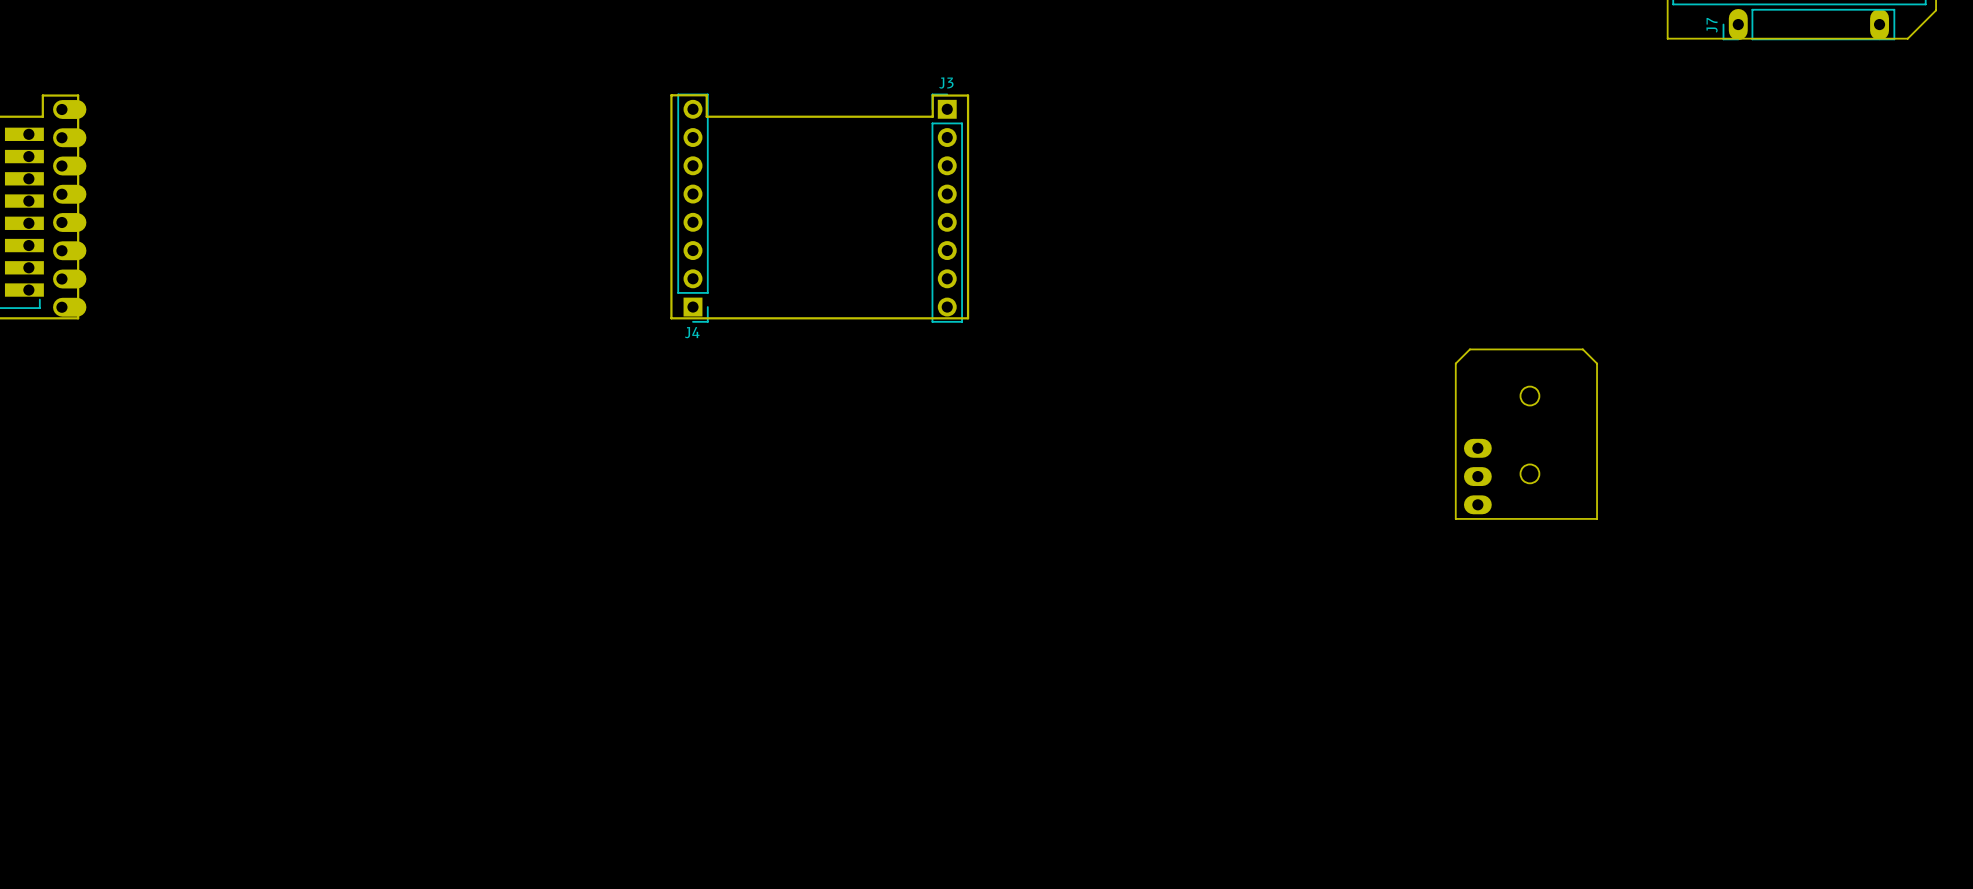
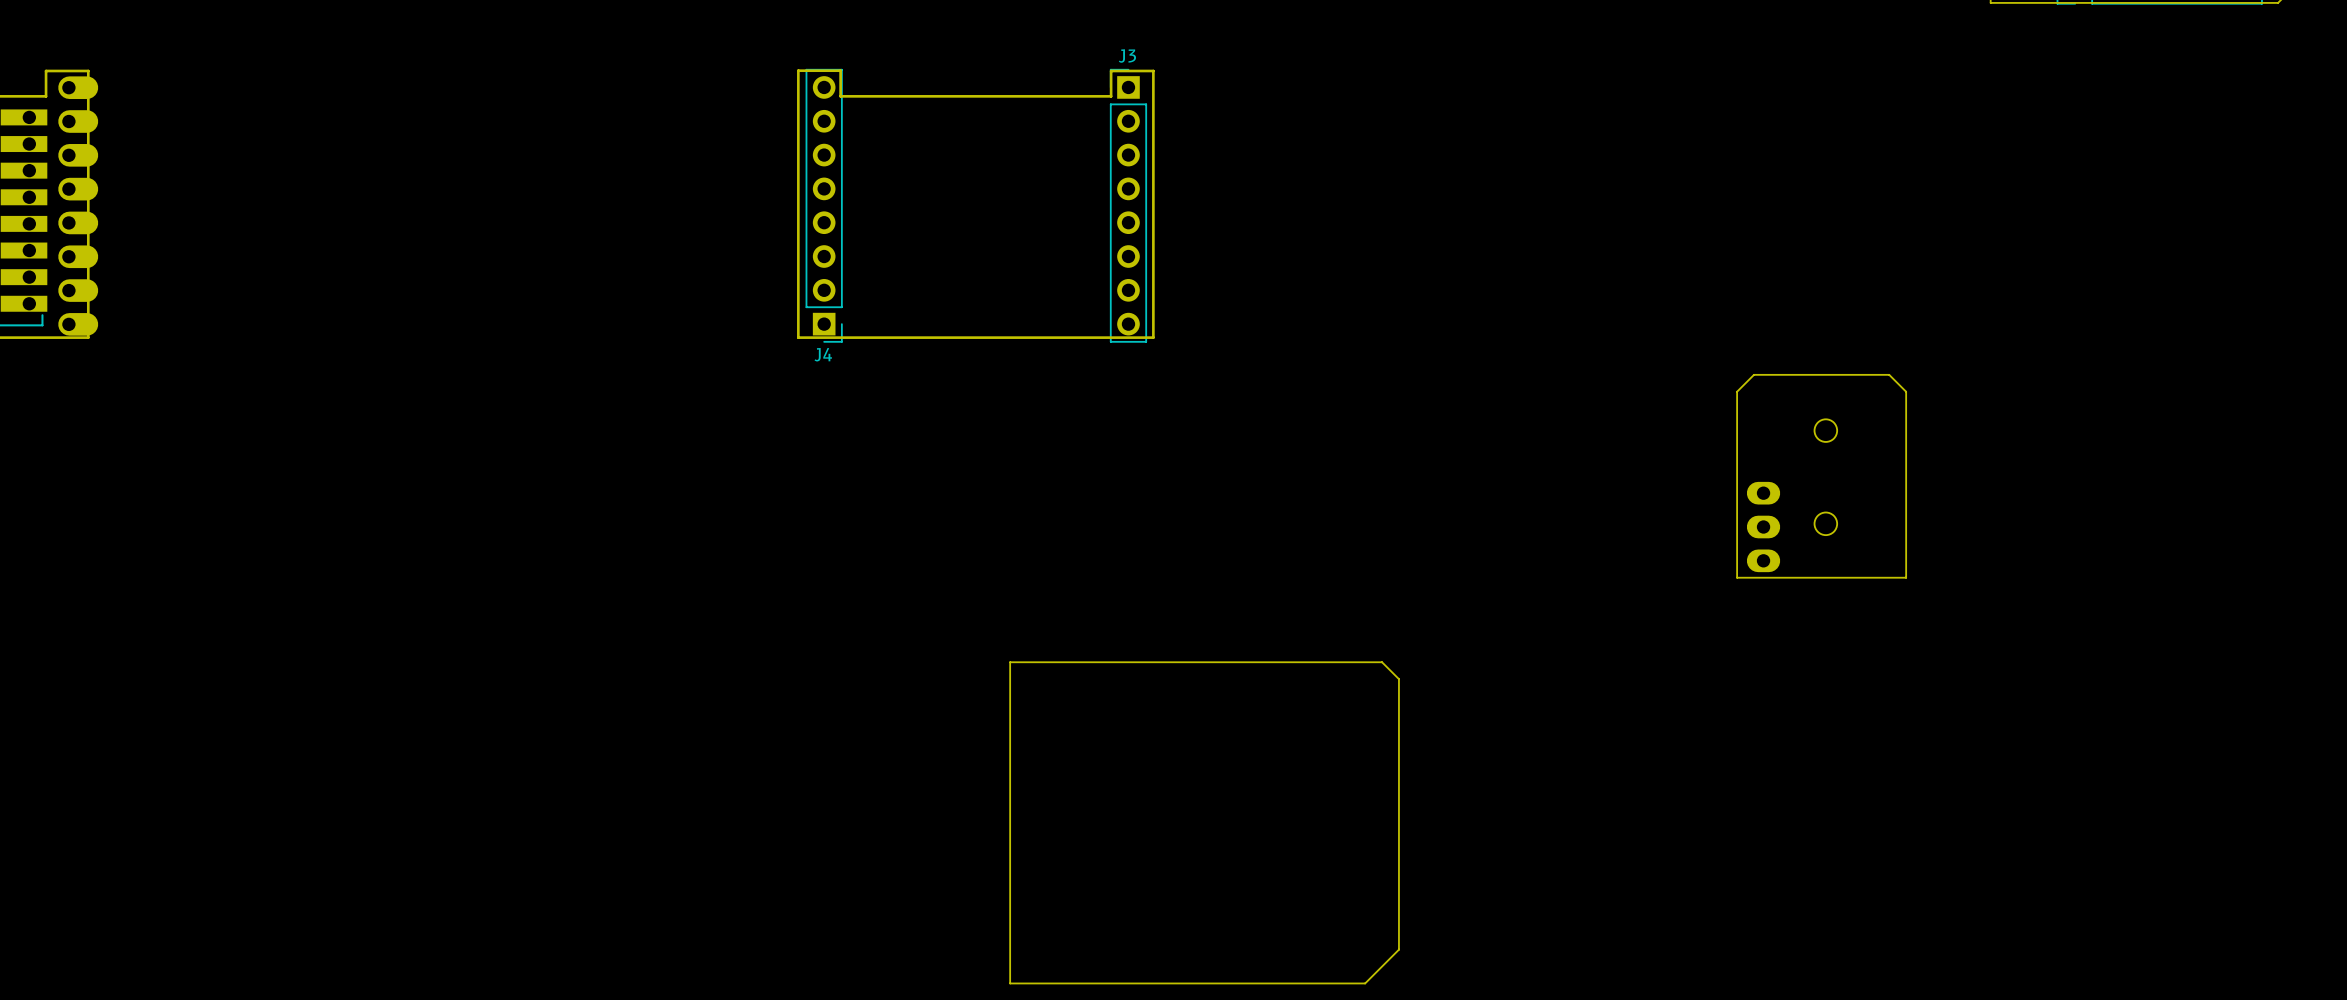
board edge: none -> (1010, 662) (1010, 983) (1365, 983) (1398, 949) (1398, 679) (1382, 662) (1010, 662)

